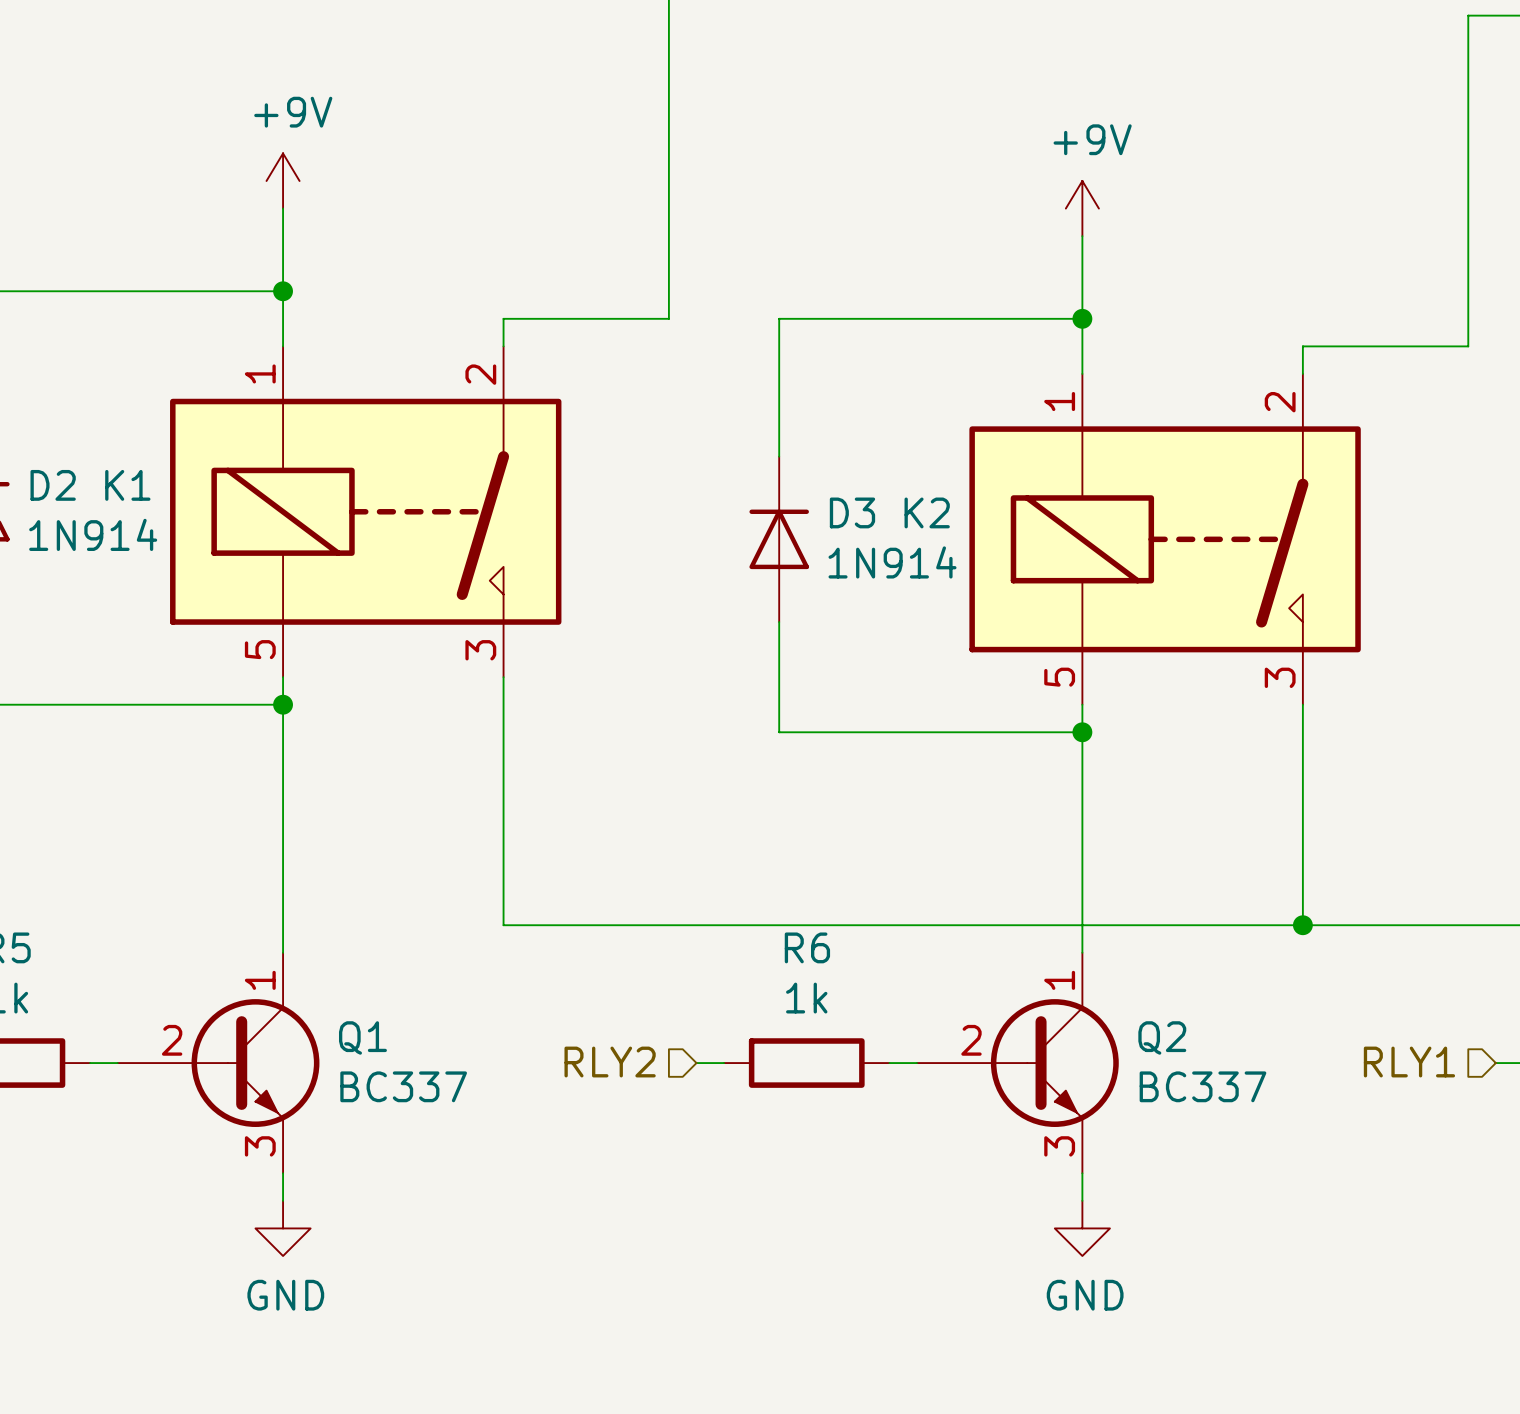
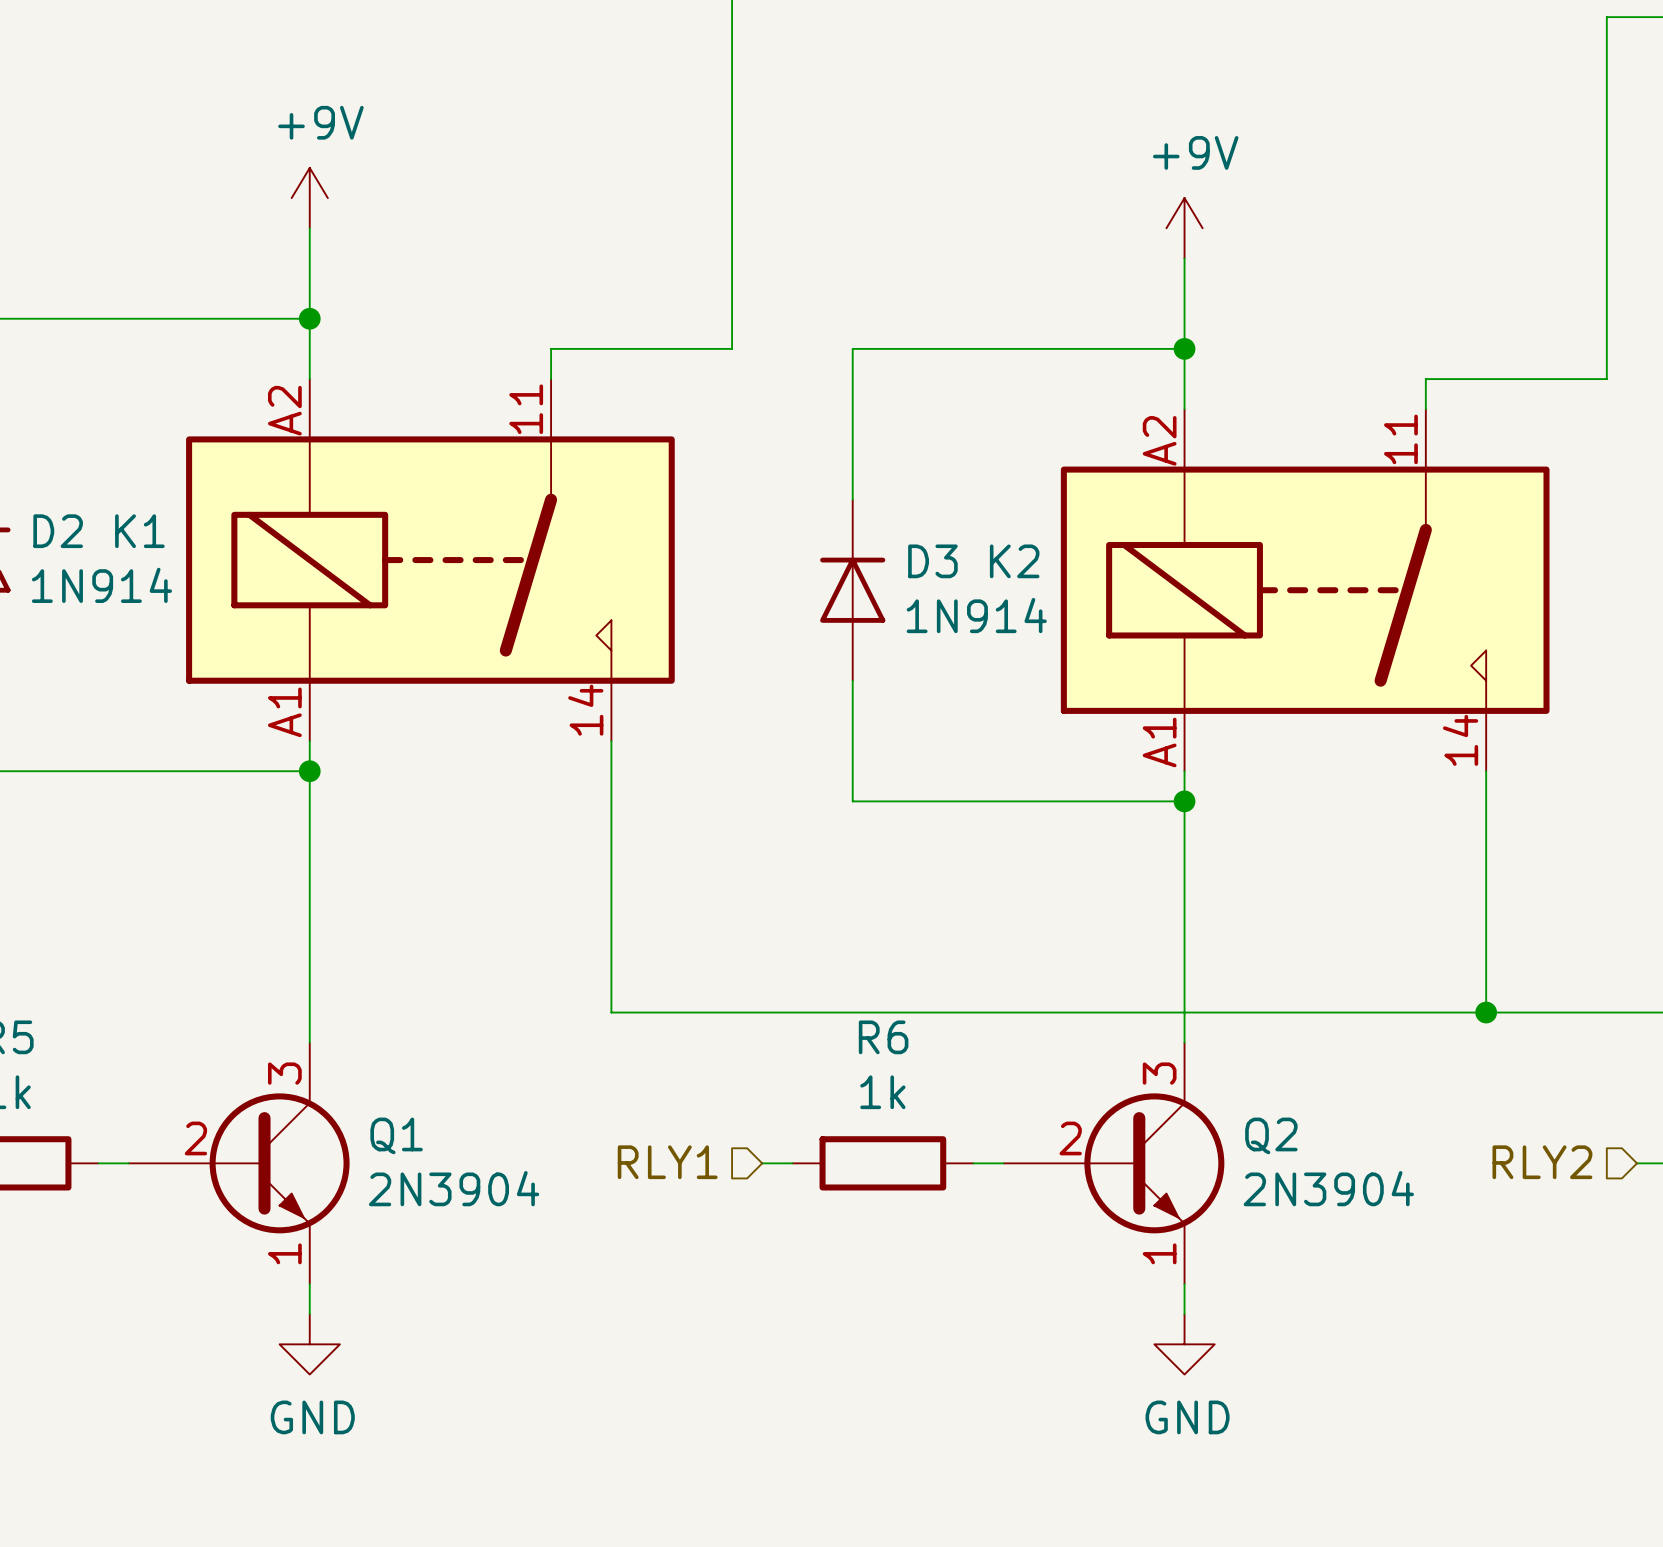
K1 symbol: [170, 346, 562, 678] -> [186, 379, 675, 742]
K2 symbol: [969, 373, 1361, 705] -> [1060, 409, 1550, 772]
wire: (503, 677) (503, 925) (558, 925) -> (611, 741) (611, 1012)
wire: (1302, 704) (1302, 925) -> (1486, 771) (1486, 1012)
junction position: (1302, 925) -> (1486, 1012)
Q1 symbol: [117, 952, 320, 1174] -> [128, 1042, 350, 1285]
Q2 symbol: [917, 952, 1119, 1174] -> [1003, 1042, 1225, 1285]
hierarchical label: RLY2 (610, 1062) -> RLY1 (667, 1162)
hierarchical label: RLY1 (1409, 1062) -> RLY2 (1542, 1162)
Q1 value: BC337 (403, 1086) -> 2N3904 (454, 1188)
Q2 value: BC337 (1202, 1086) -> 2N3904 (1328, 1188)

